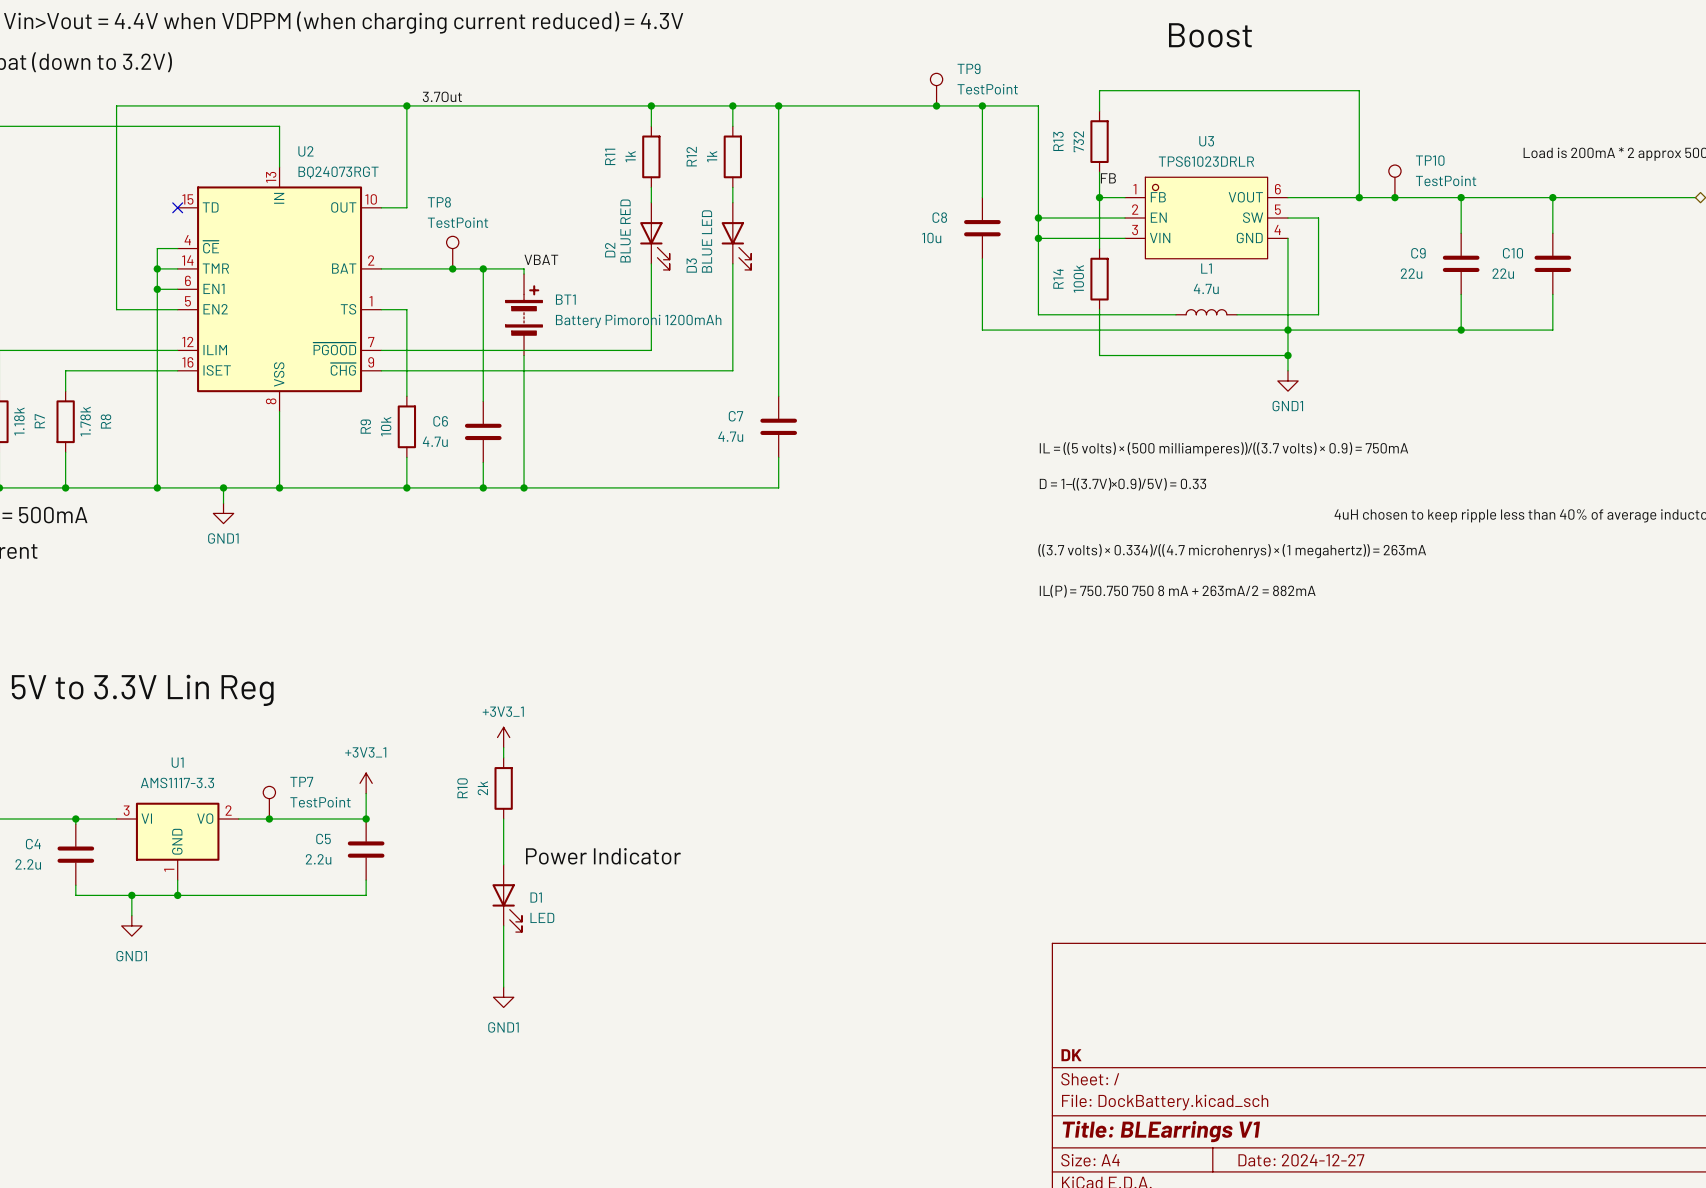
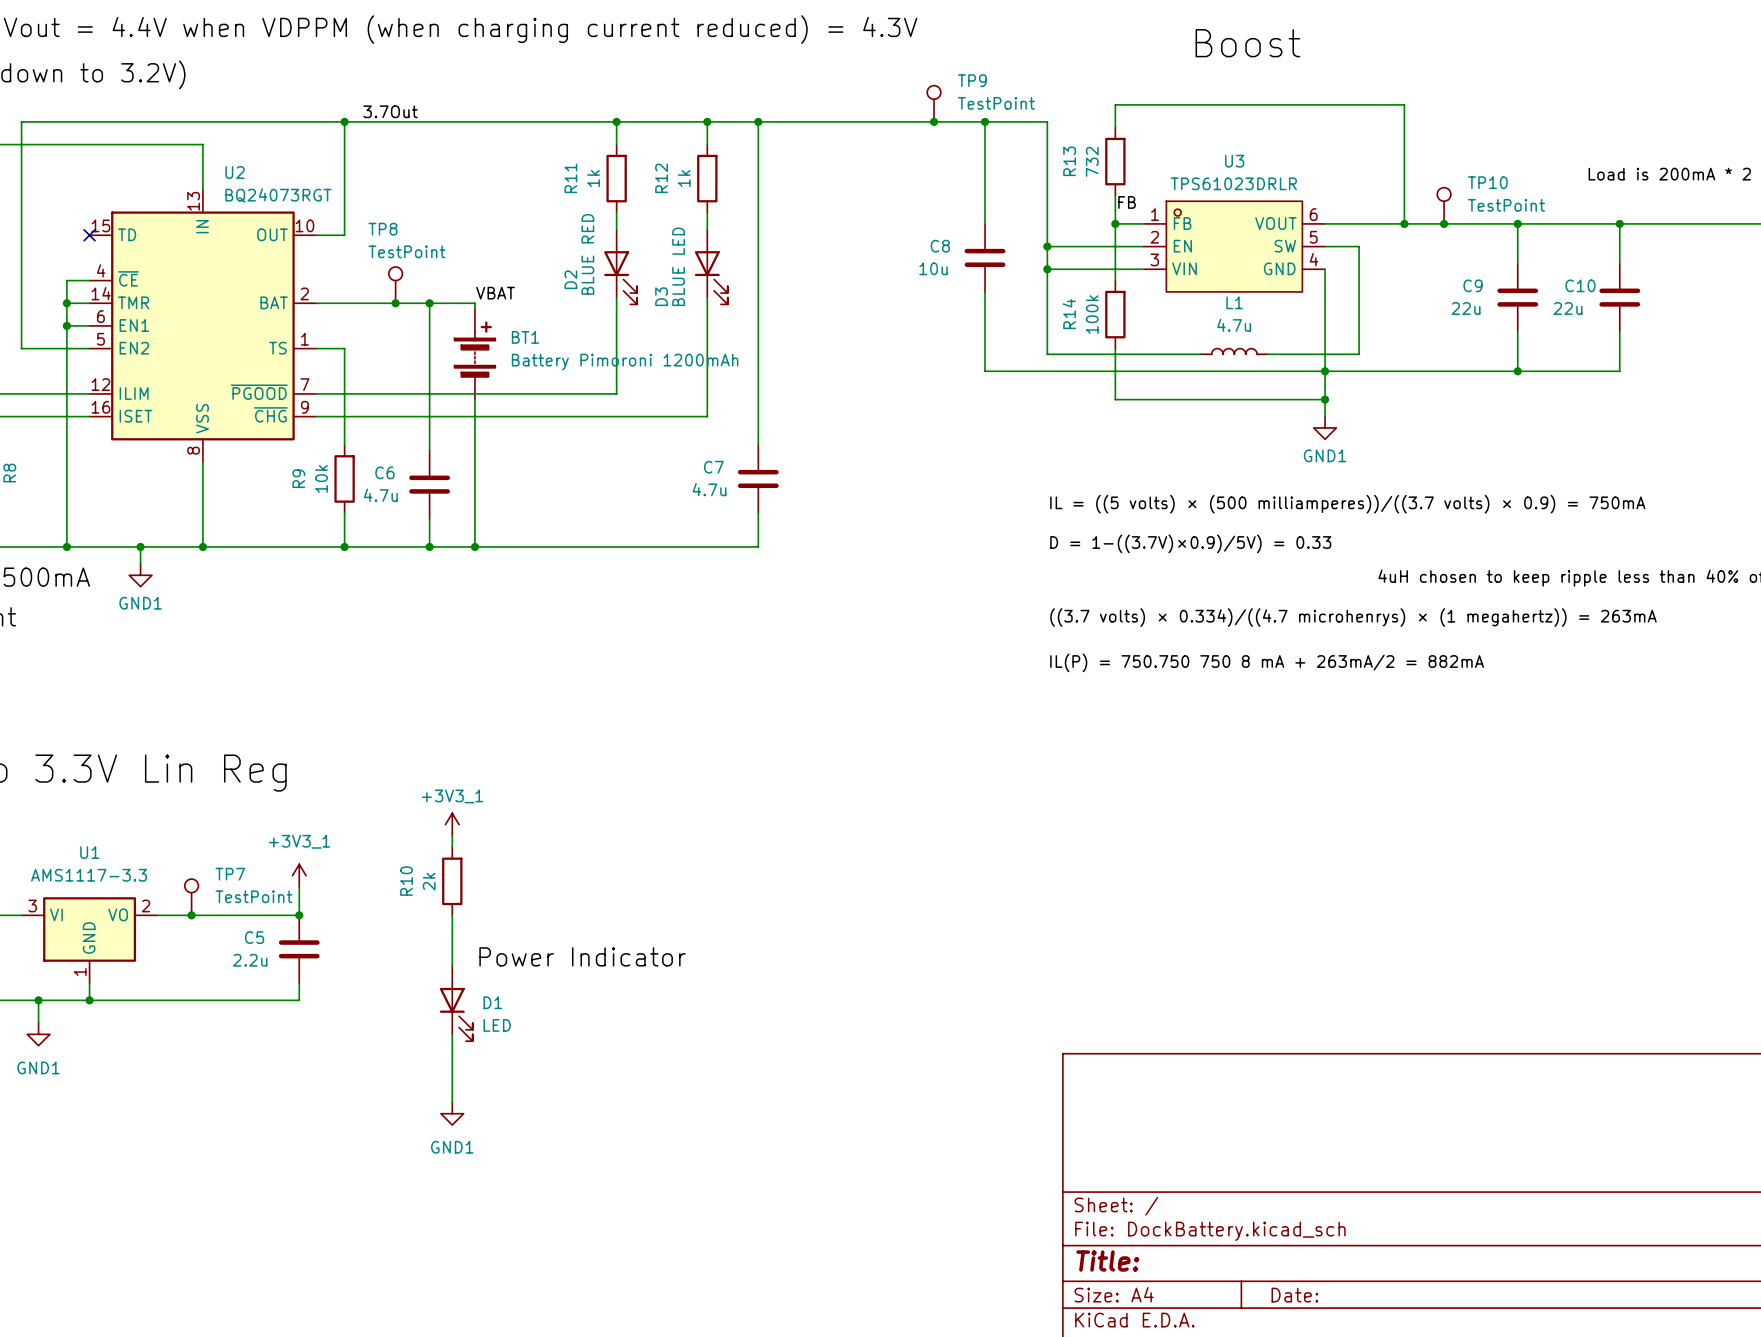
title block: DK (1071, 1055) -> none
title block: Title: BLEarrings V1 (1161, 1131) -> Title: (1107, 1261)
title block: Date: 2024-12-27 (1301, 1160) -> Date: (1294, 1295)

